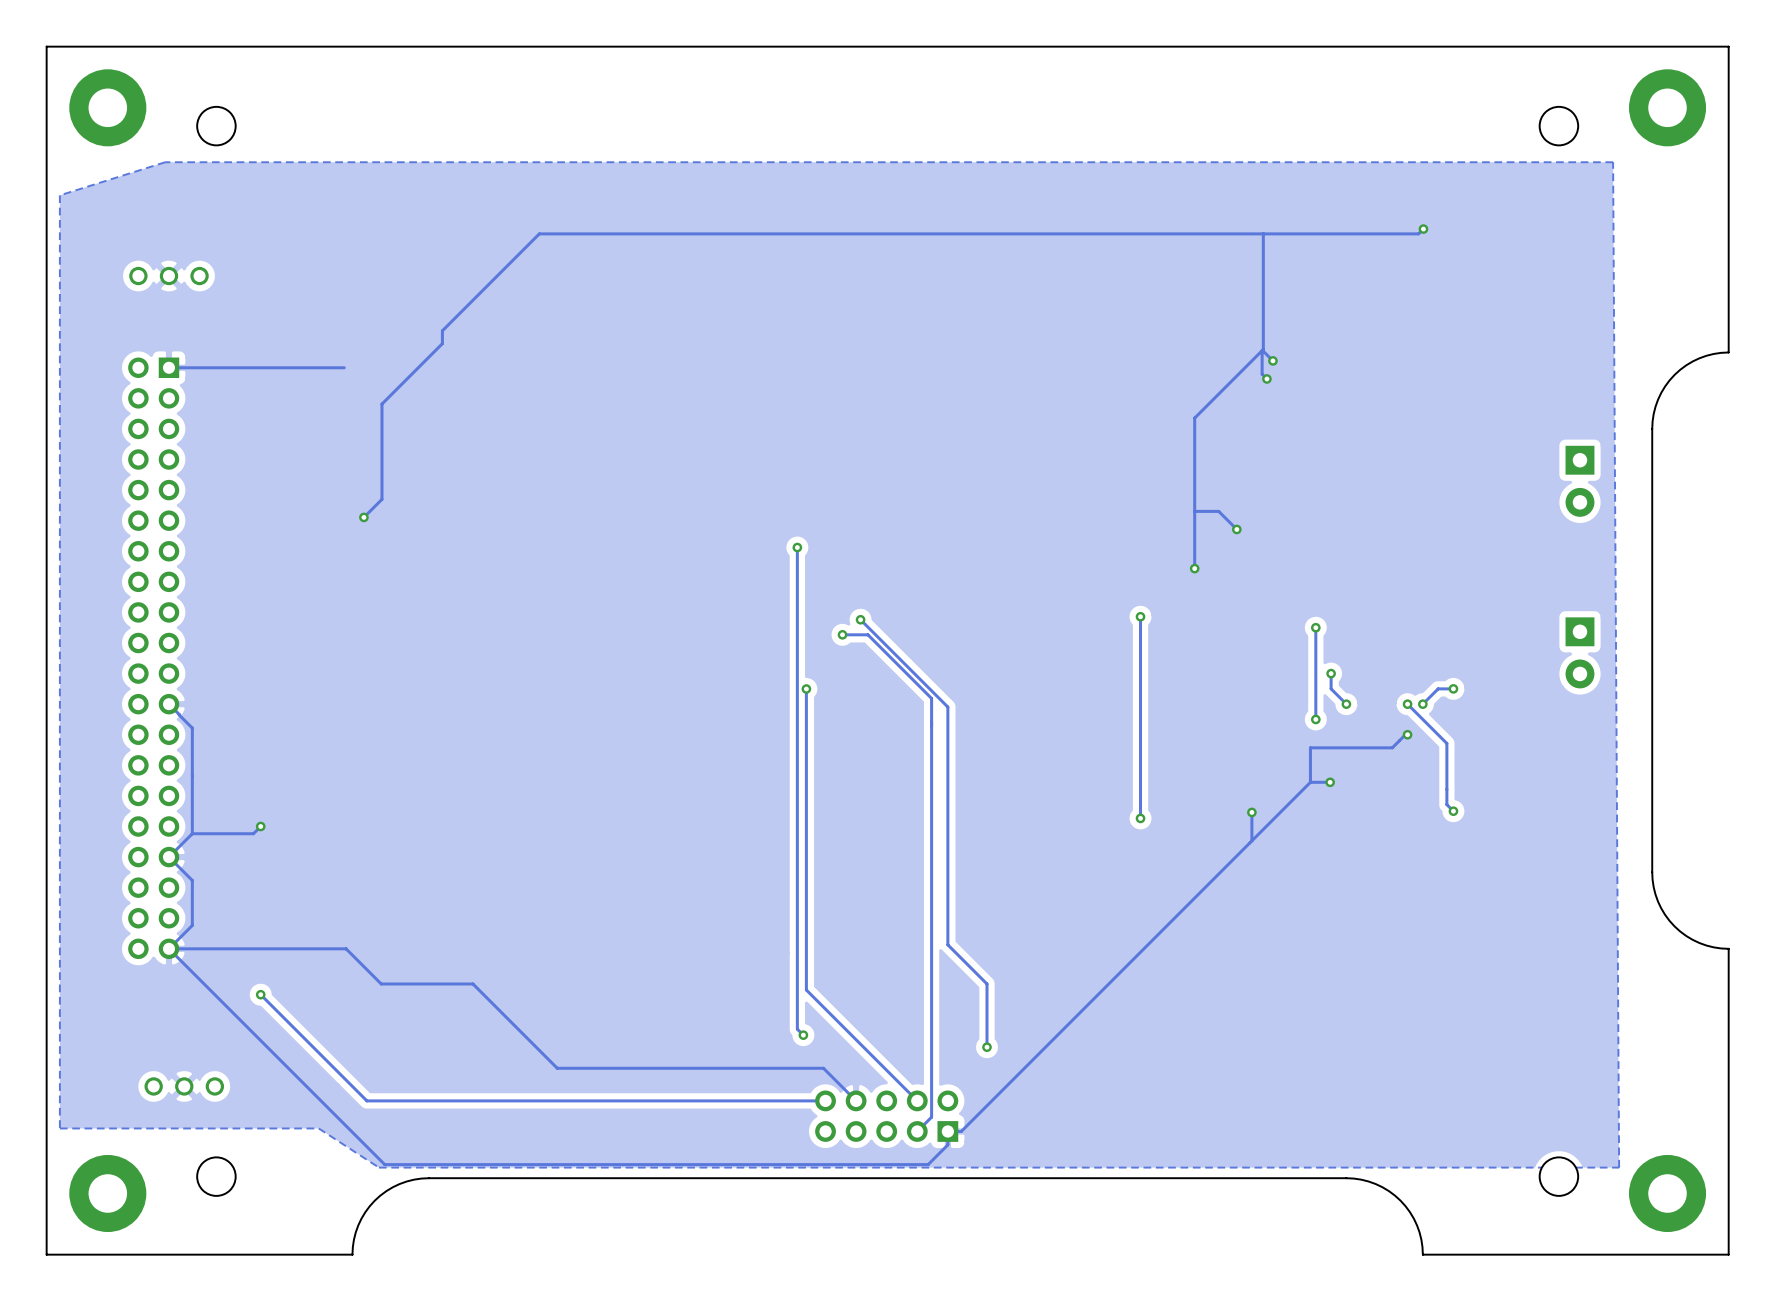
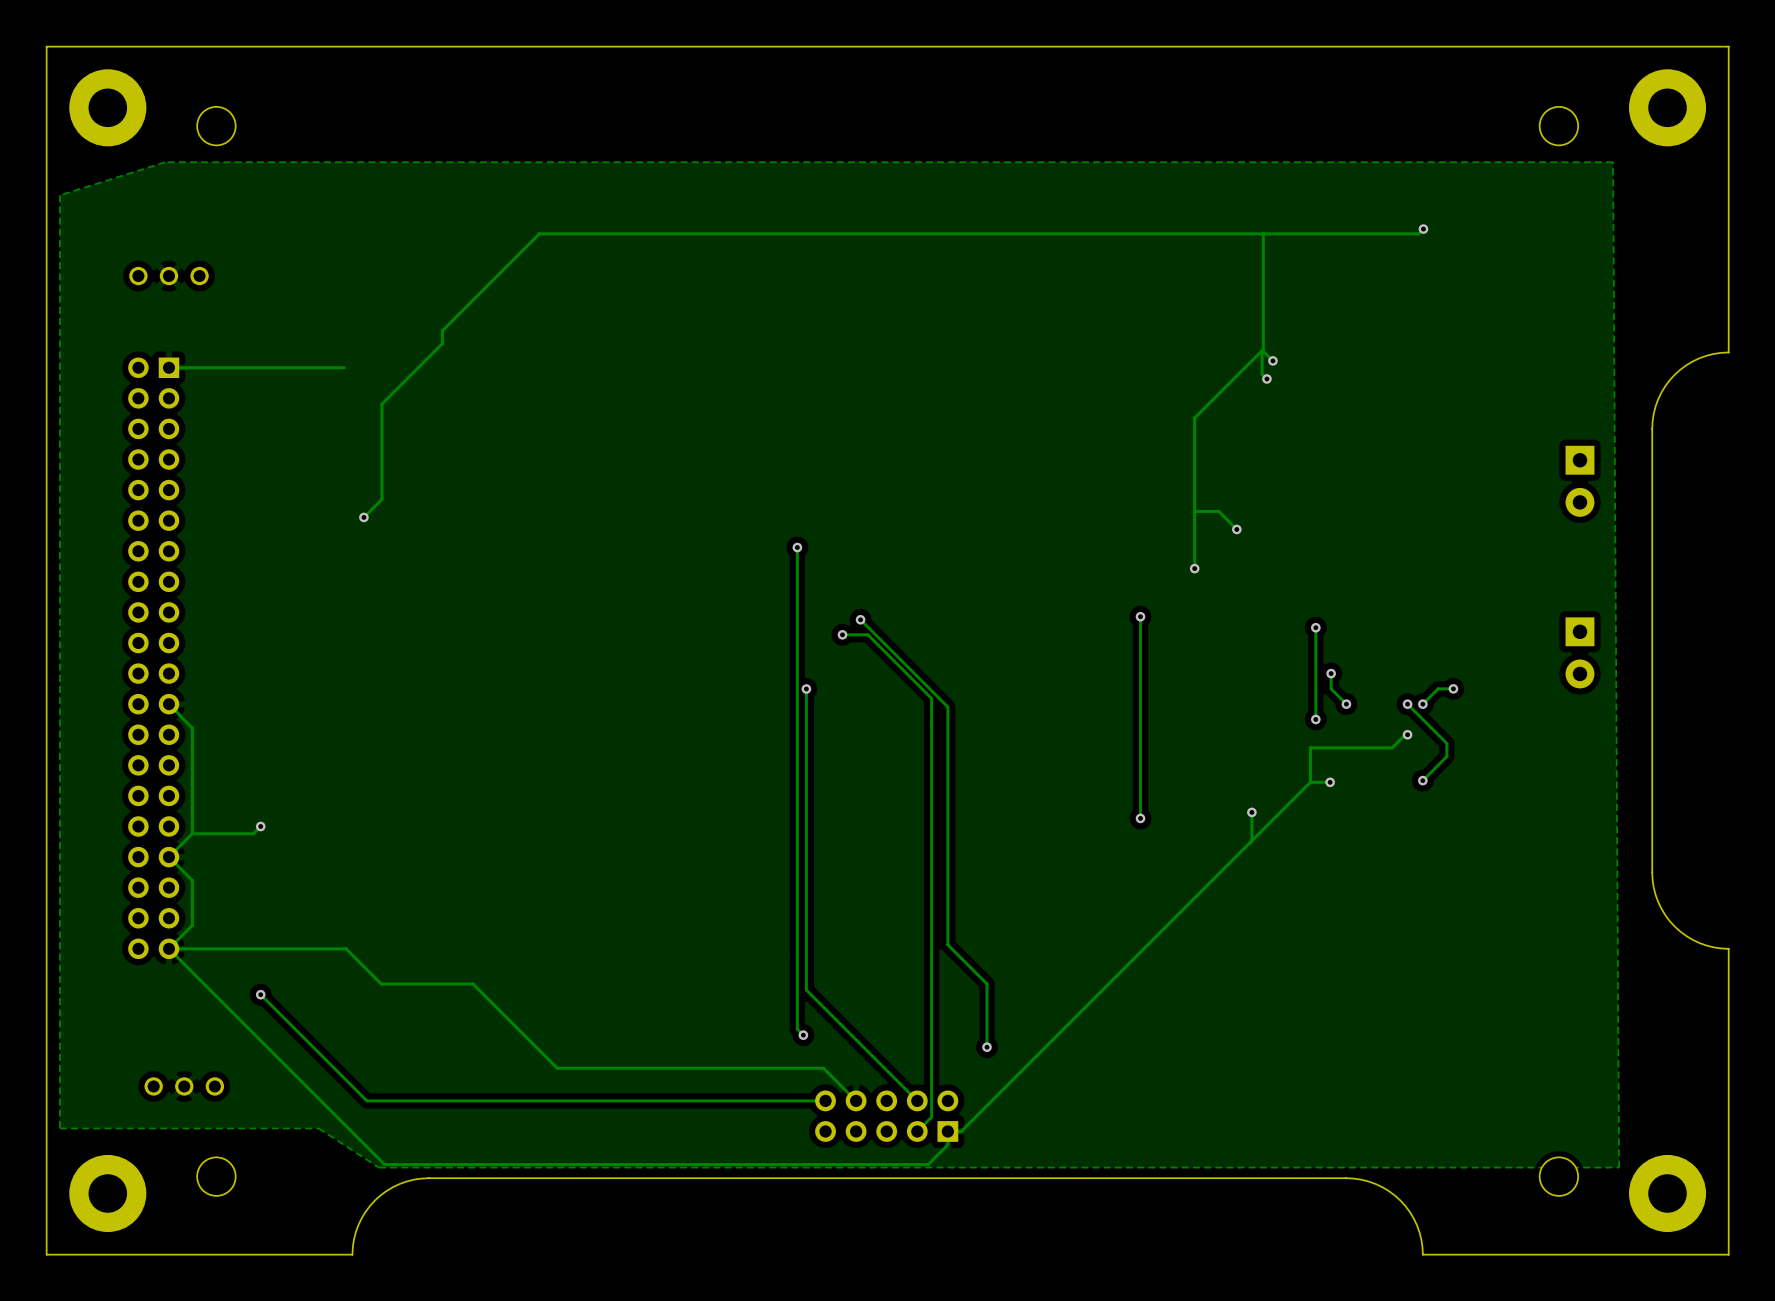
track: (1446, 756) (1446, 804) (1453, 811) -> (1446, 756) (1422, 780)
via position: (1453, 811) -> (1422, 780)

